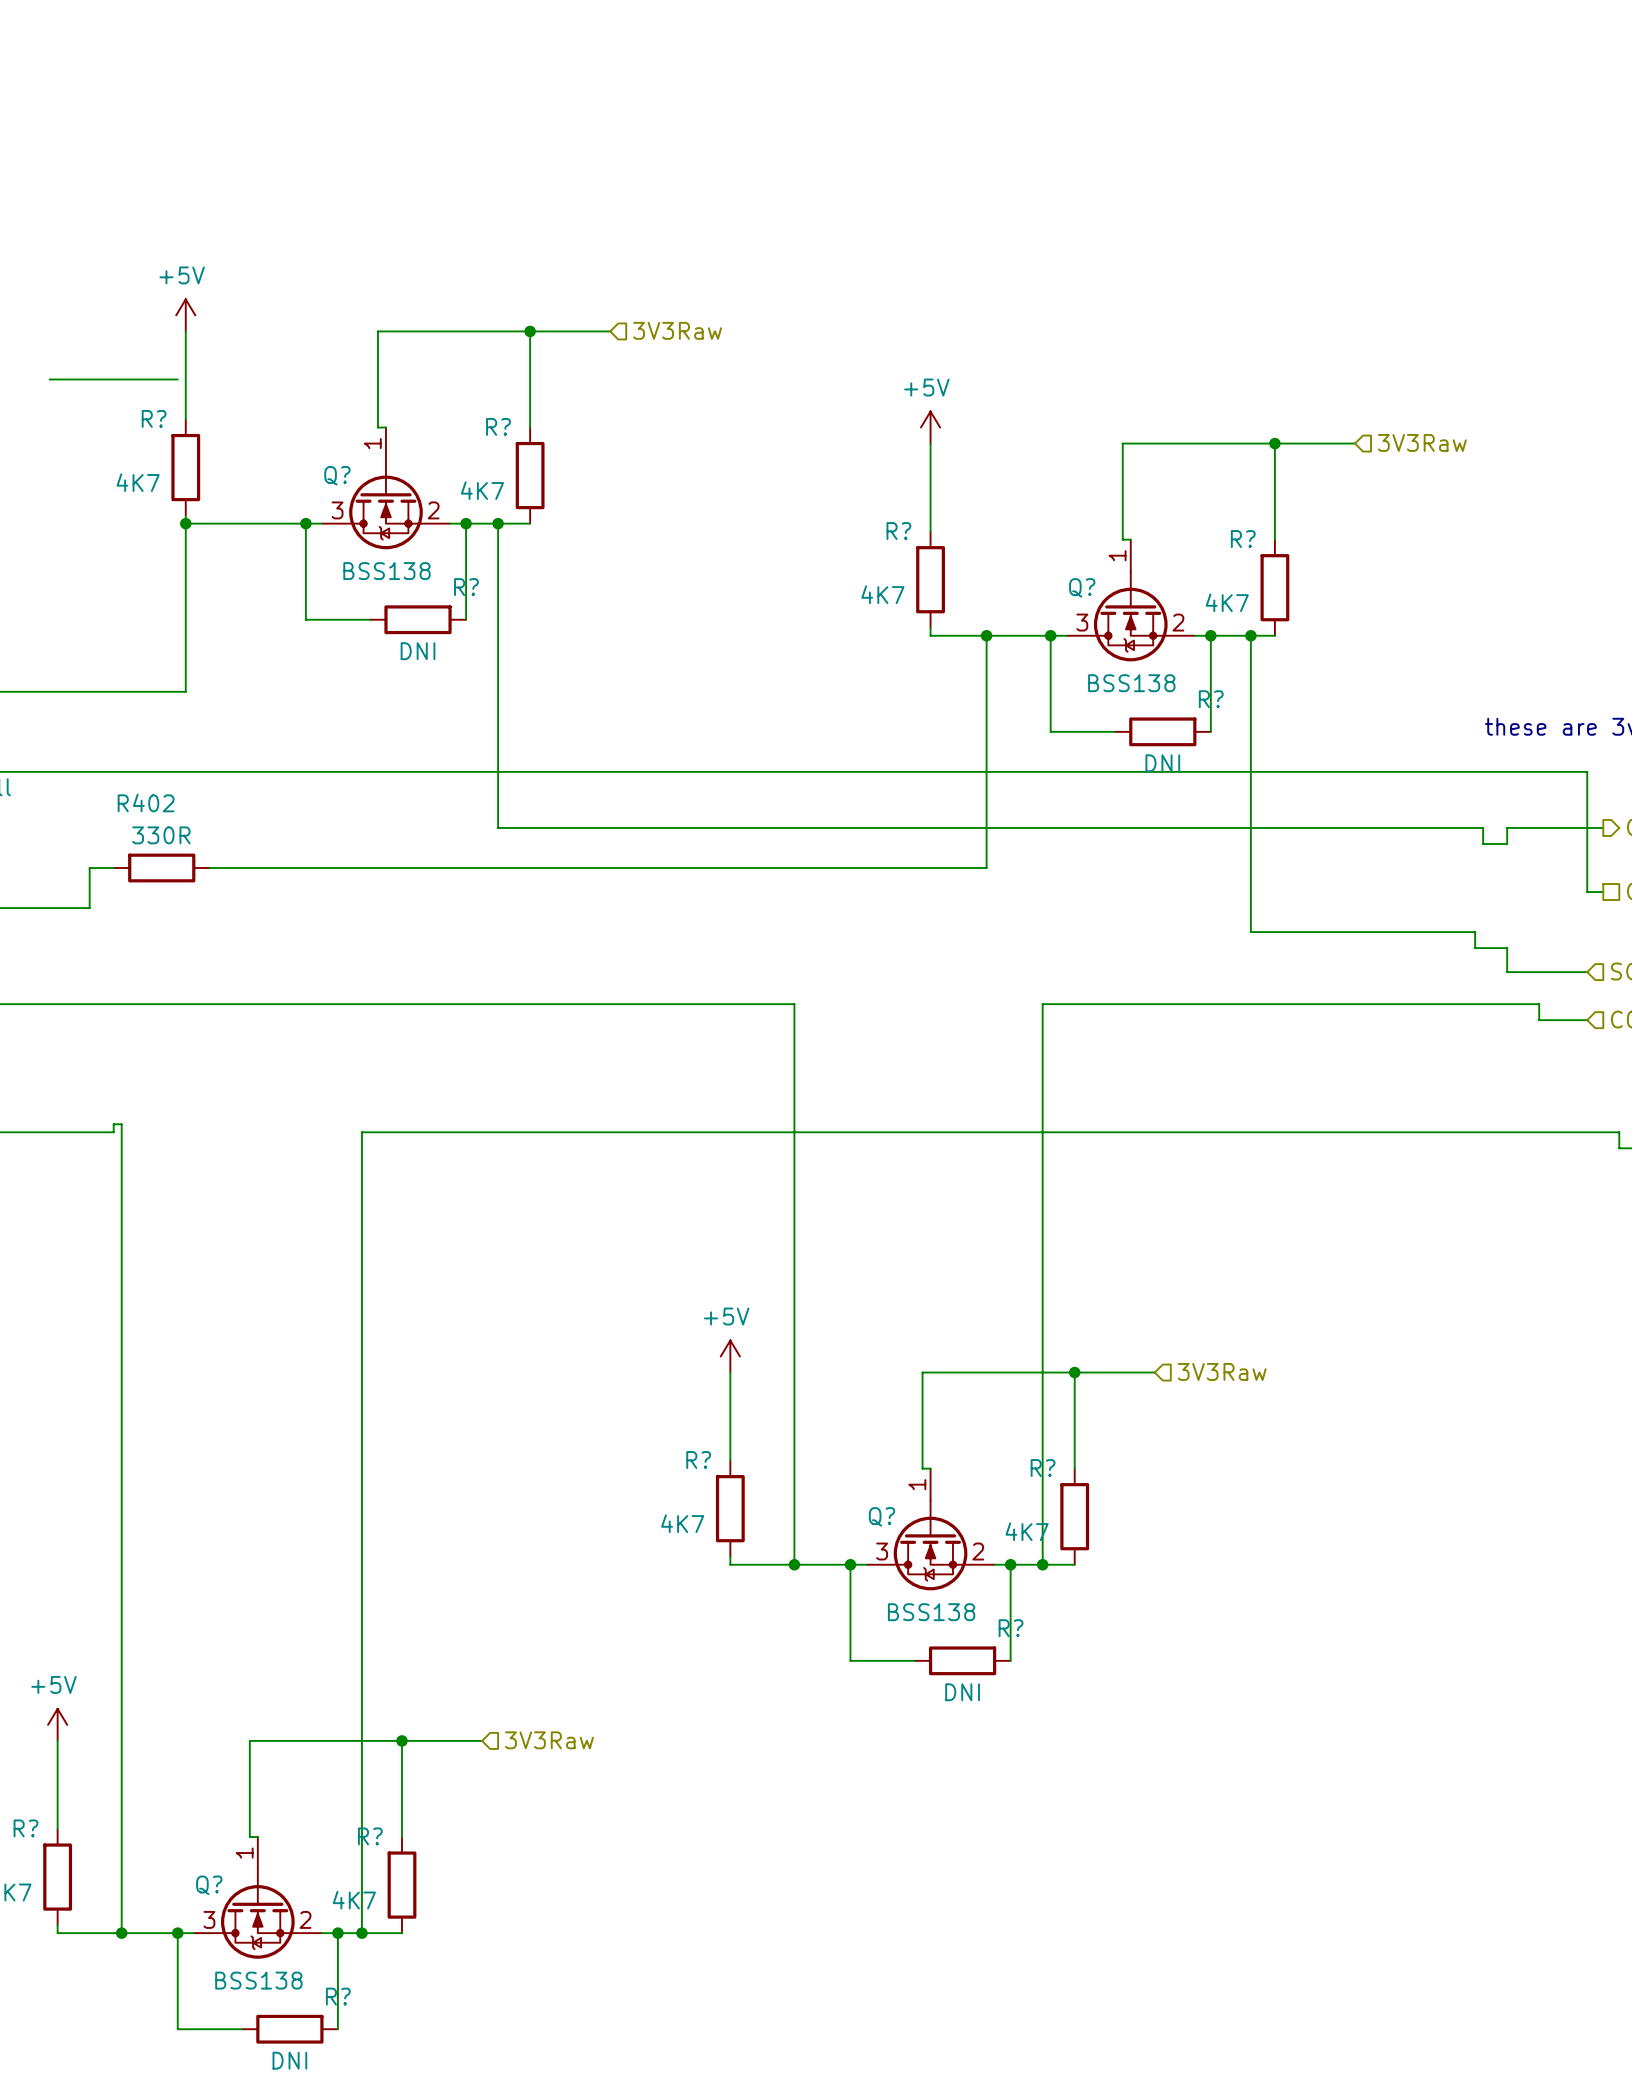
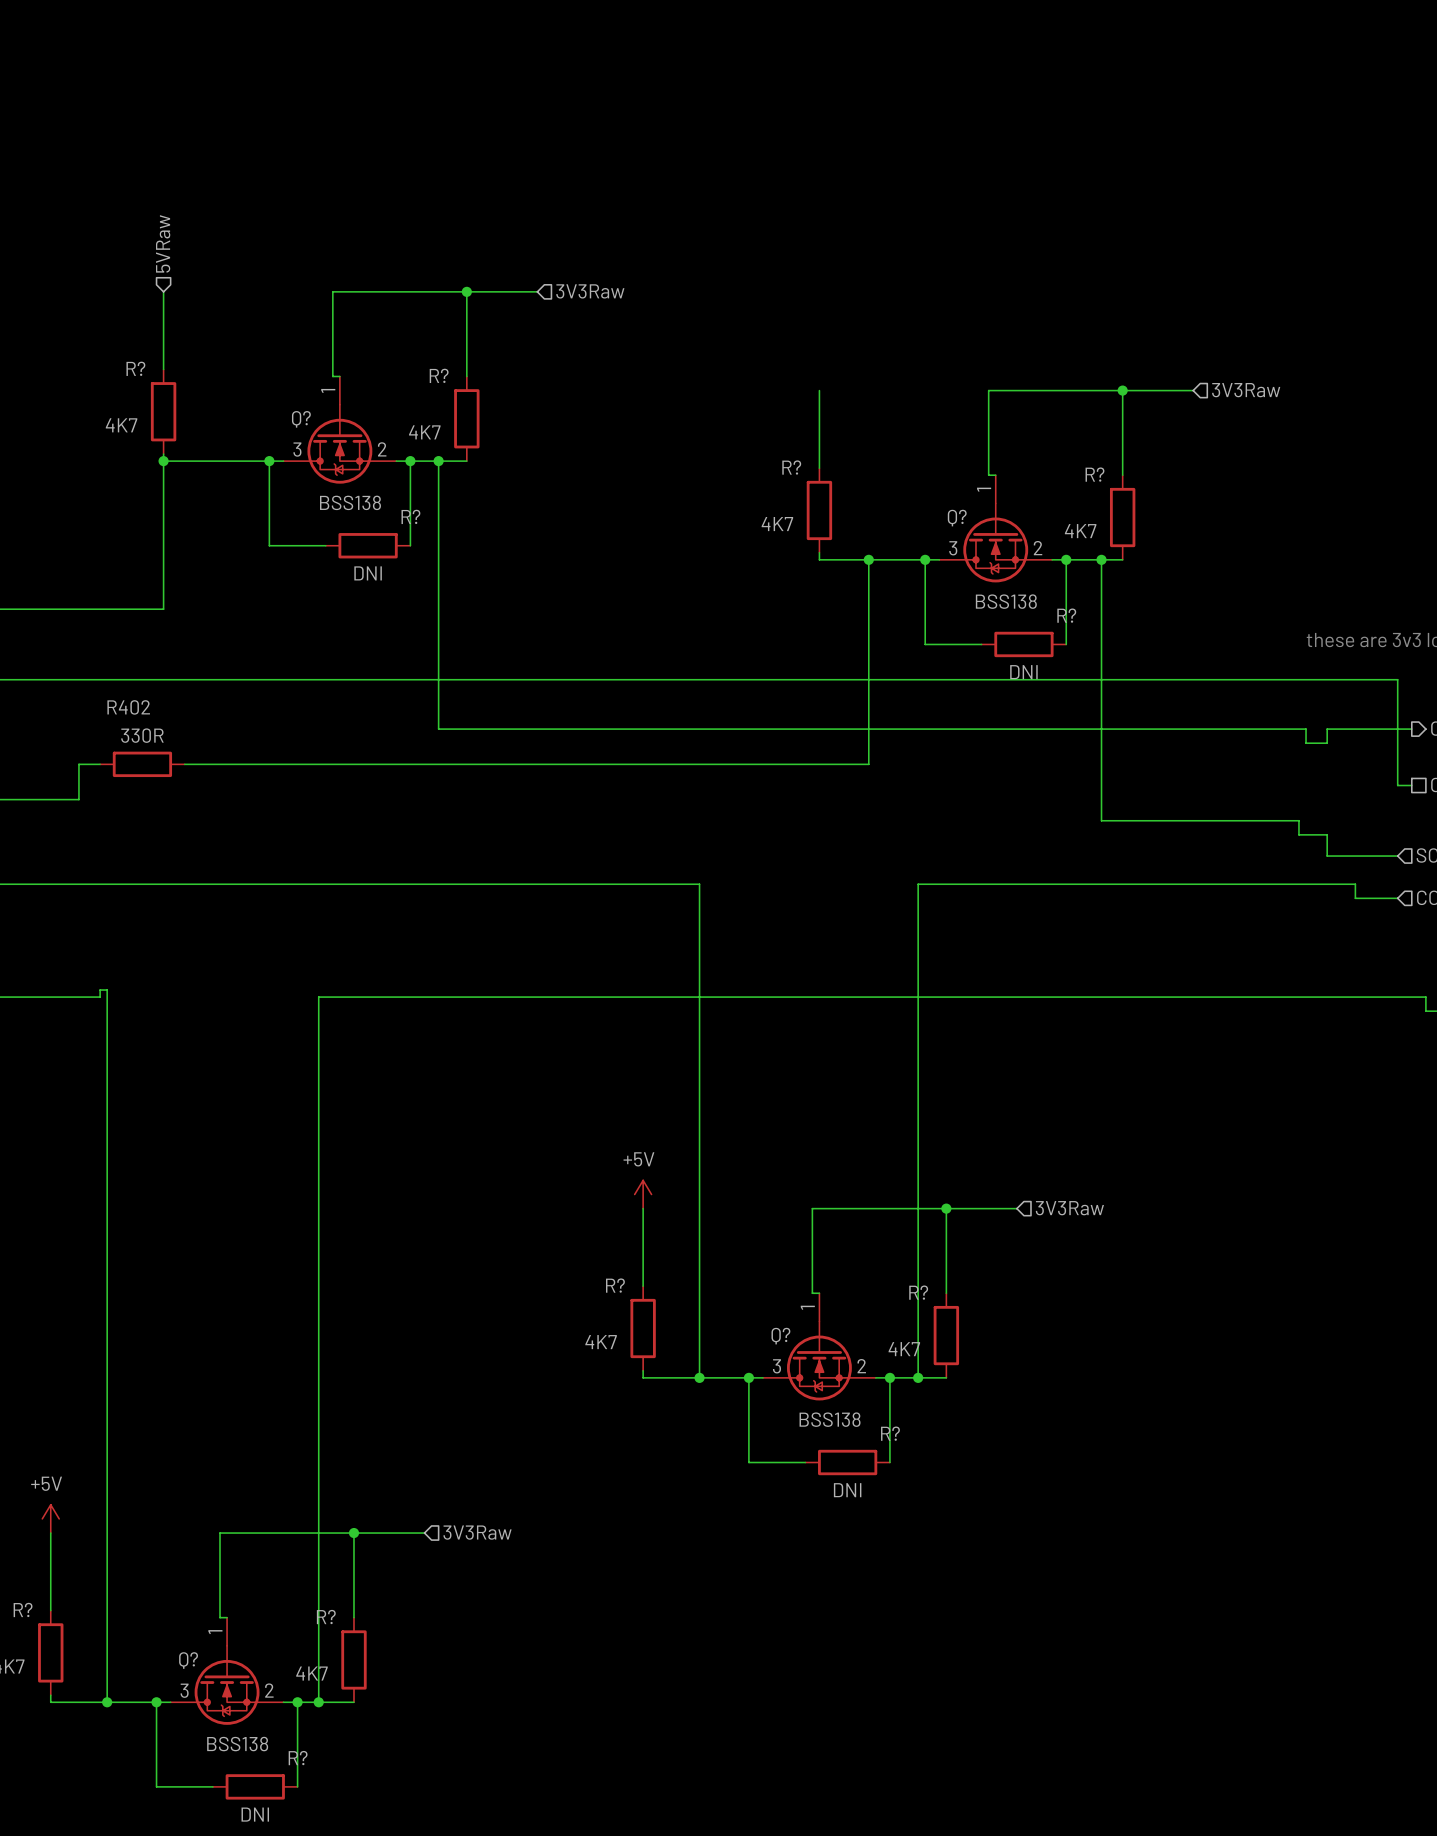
hierarchical label: none -> 5VRaw (163, 243)
power symbol: +5V (185, 315) -> none
wire: (49, 379) (177, 379) -> none
power symbol: +5V (930, 427) -> none

